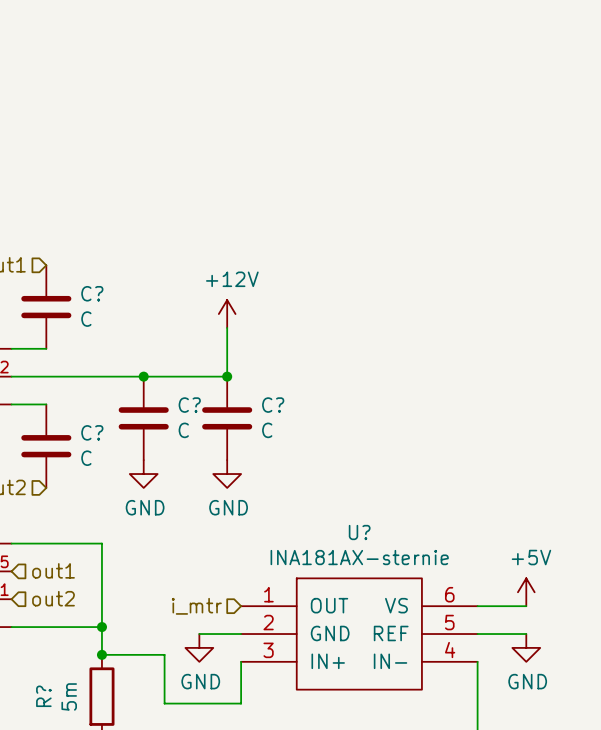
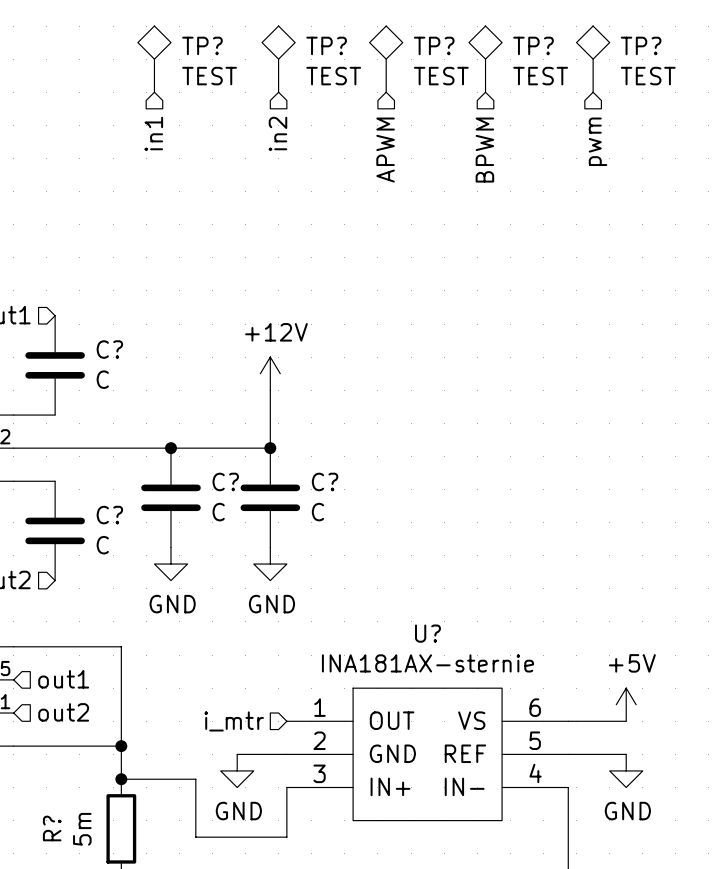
TP?: none -> TEST (154, 59)
TP?: none -> TEST (278, 59)
TP?: none -> TEST (386, 59)
TP?: none -> TEST (485, 59)
TP?: none -> TEST (593, 59)
hierarchical label: none -> in1 (153, 133)
hierarchical label: none -> in2 (277, 133)
hierarchical label: none -> pwm (598, 141)
hierarchical label: none -> APWM (385, 150)
hierarchical label: none -> BPWM (484, 150)

